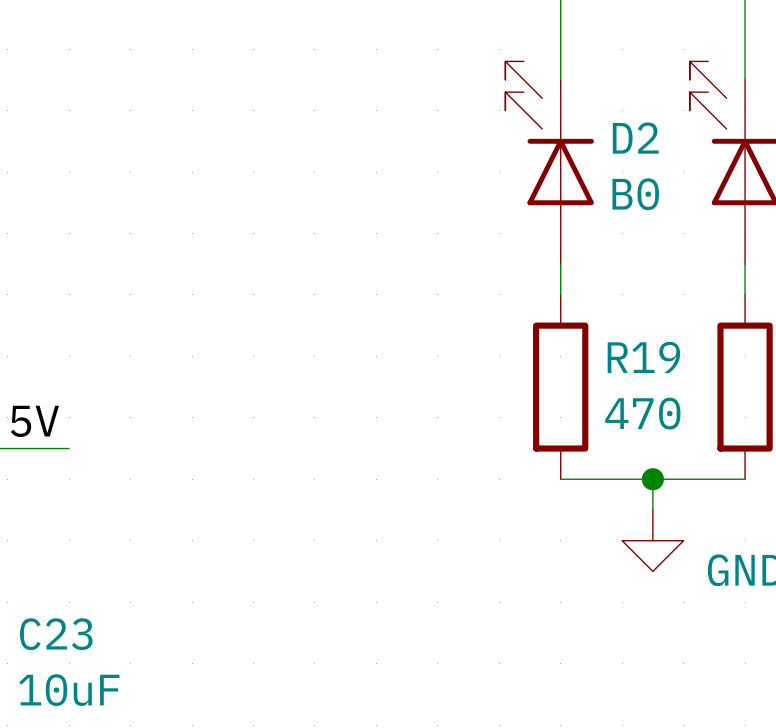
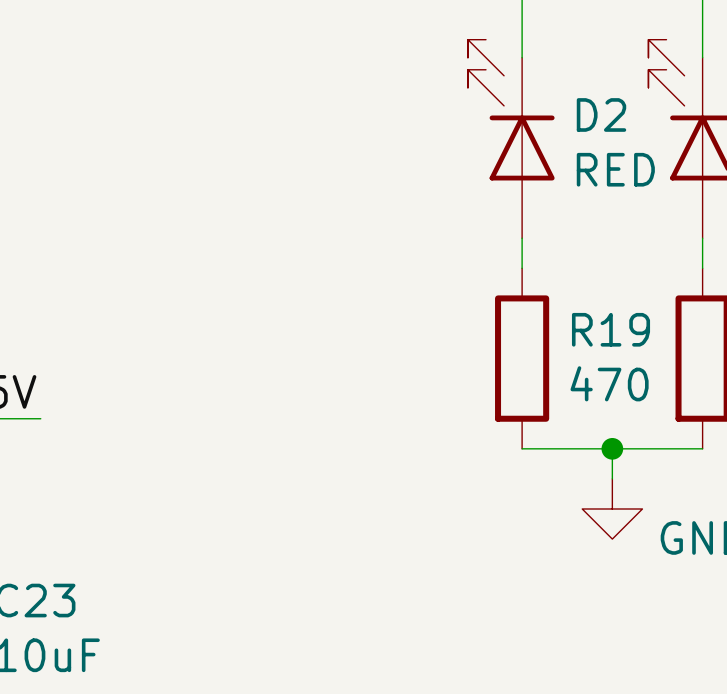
D2 value: B0 (635, 194) -> RED (615, 169)

